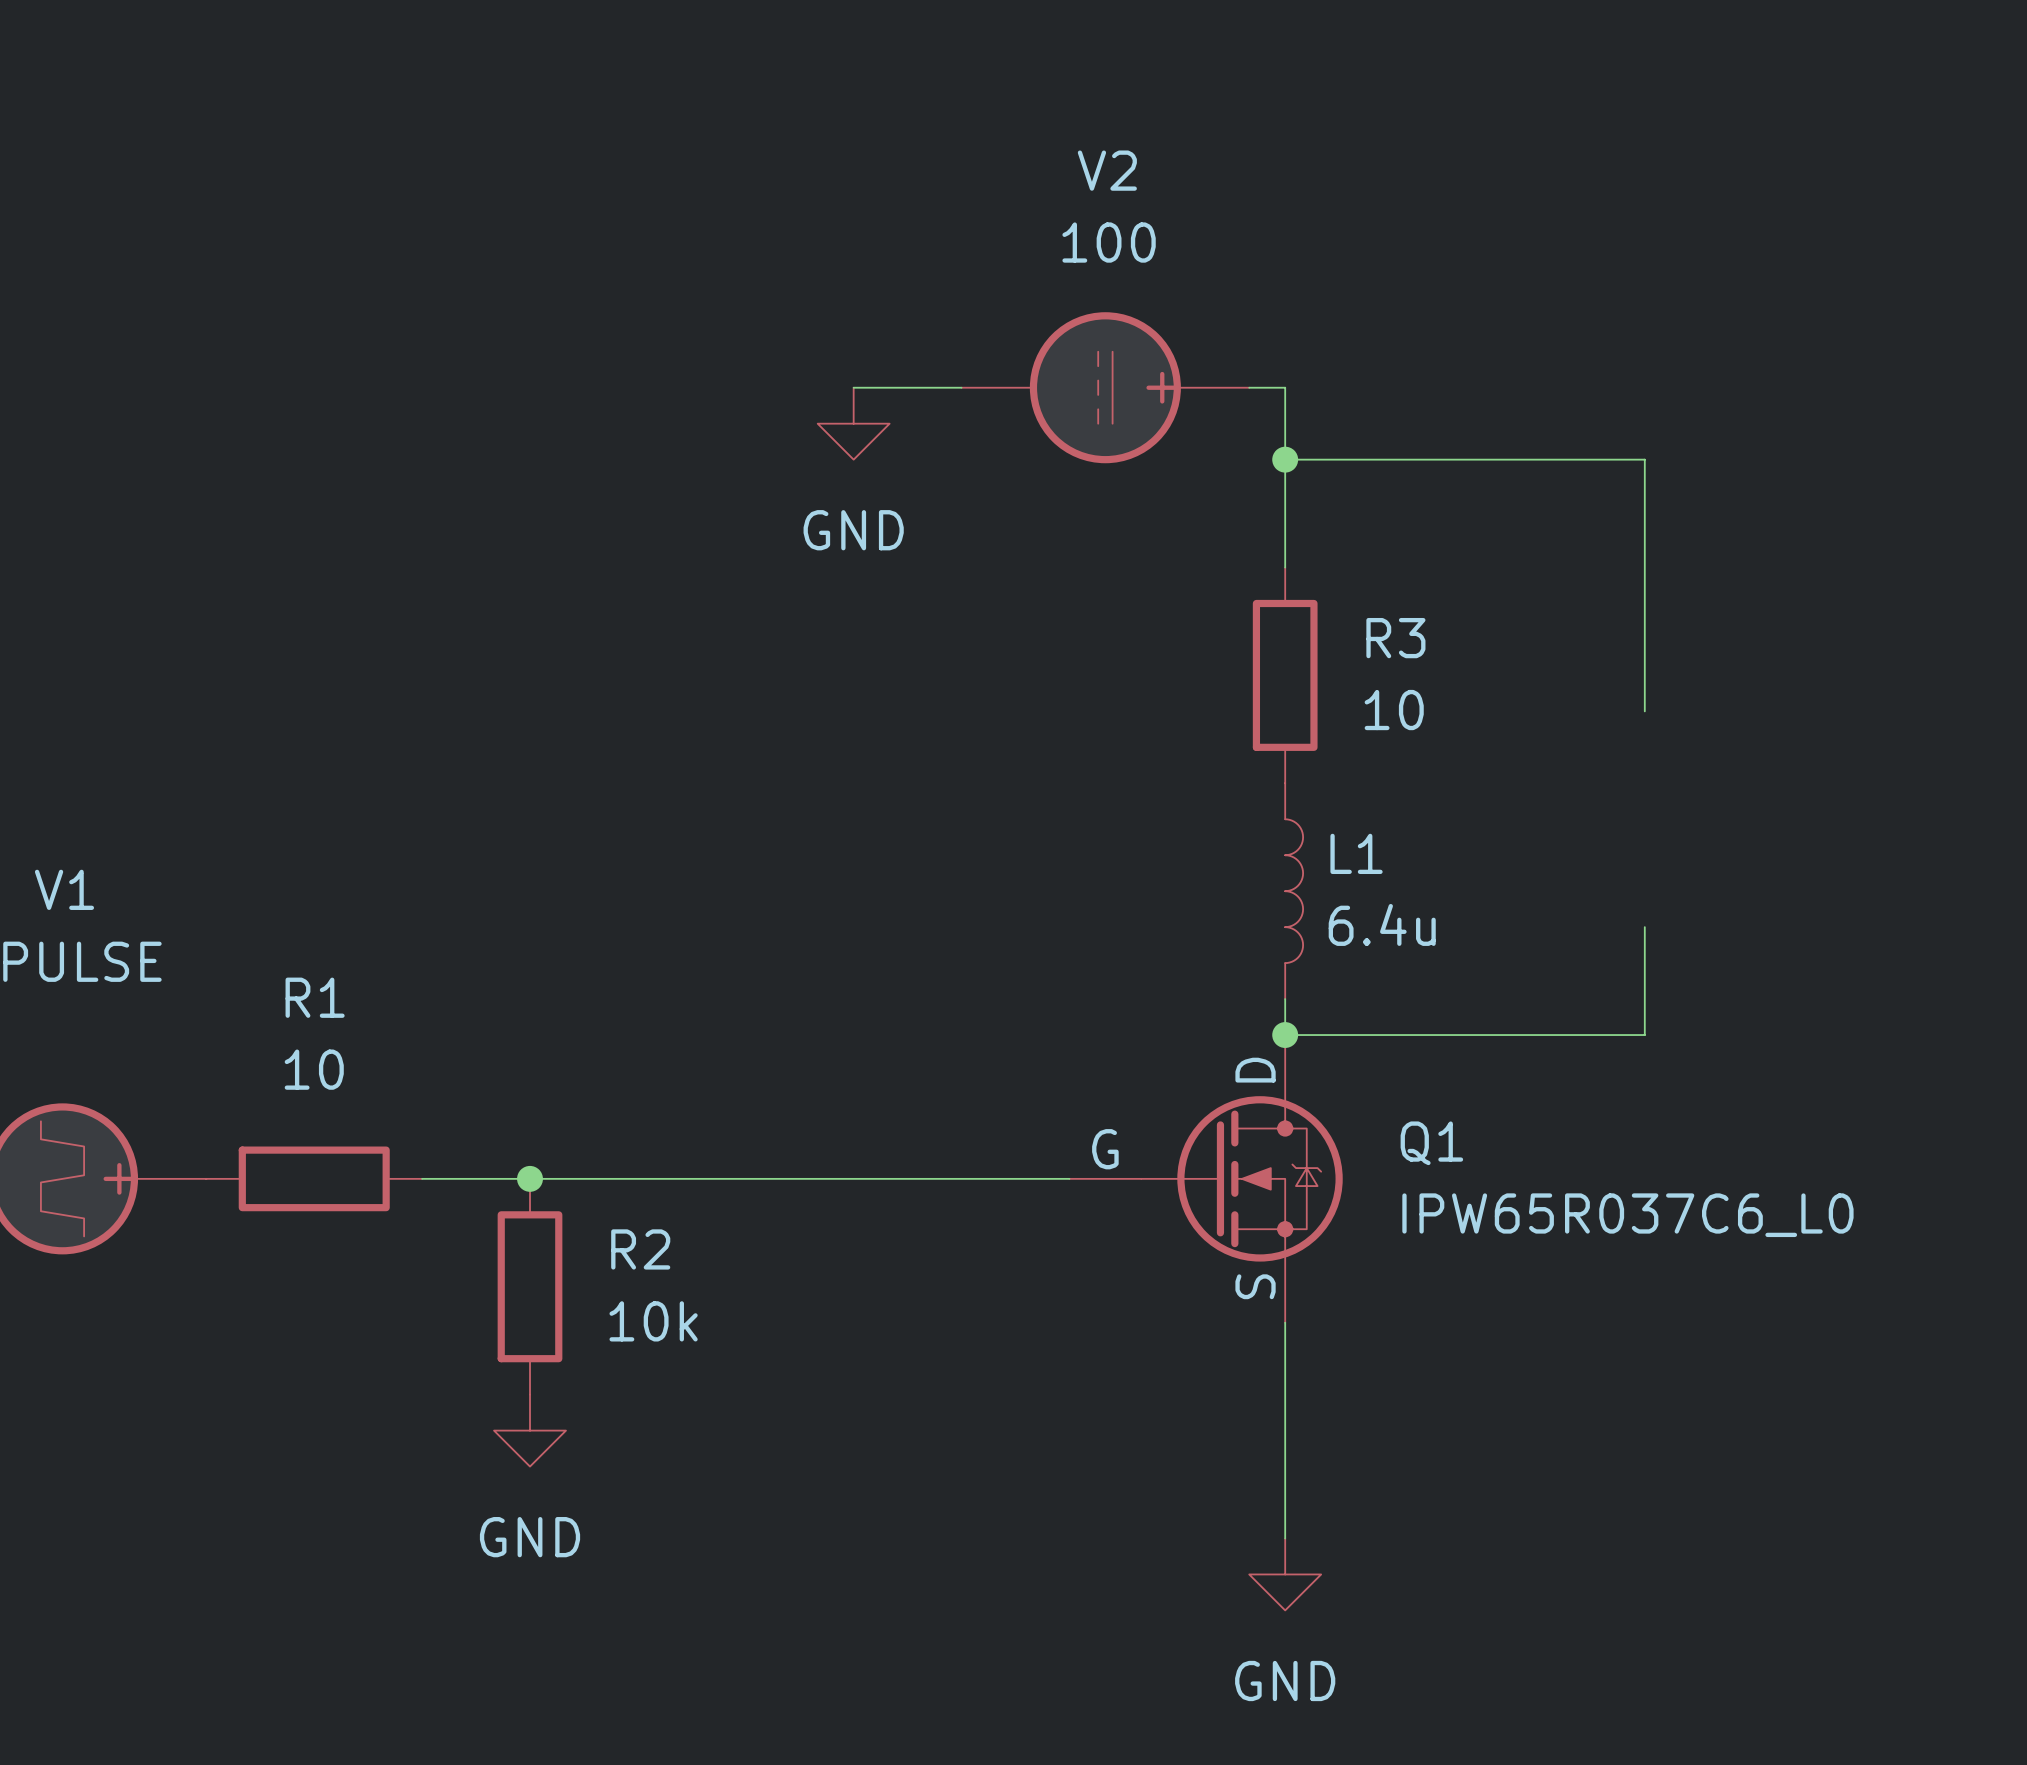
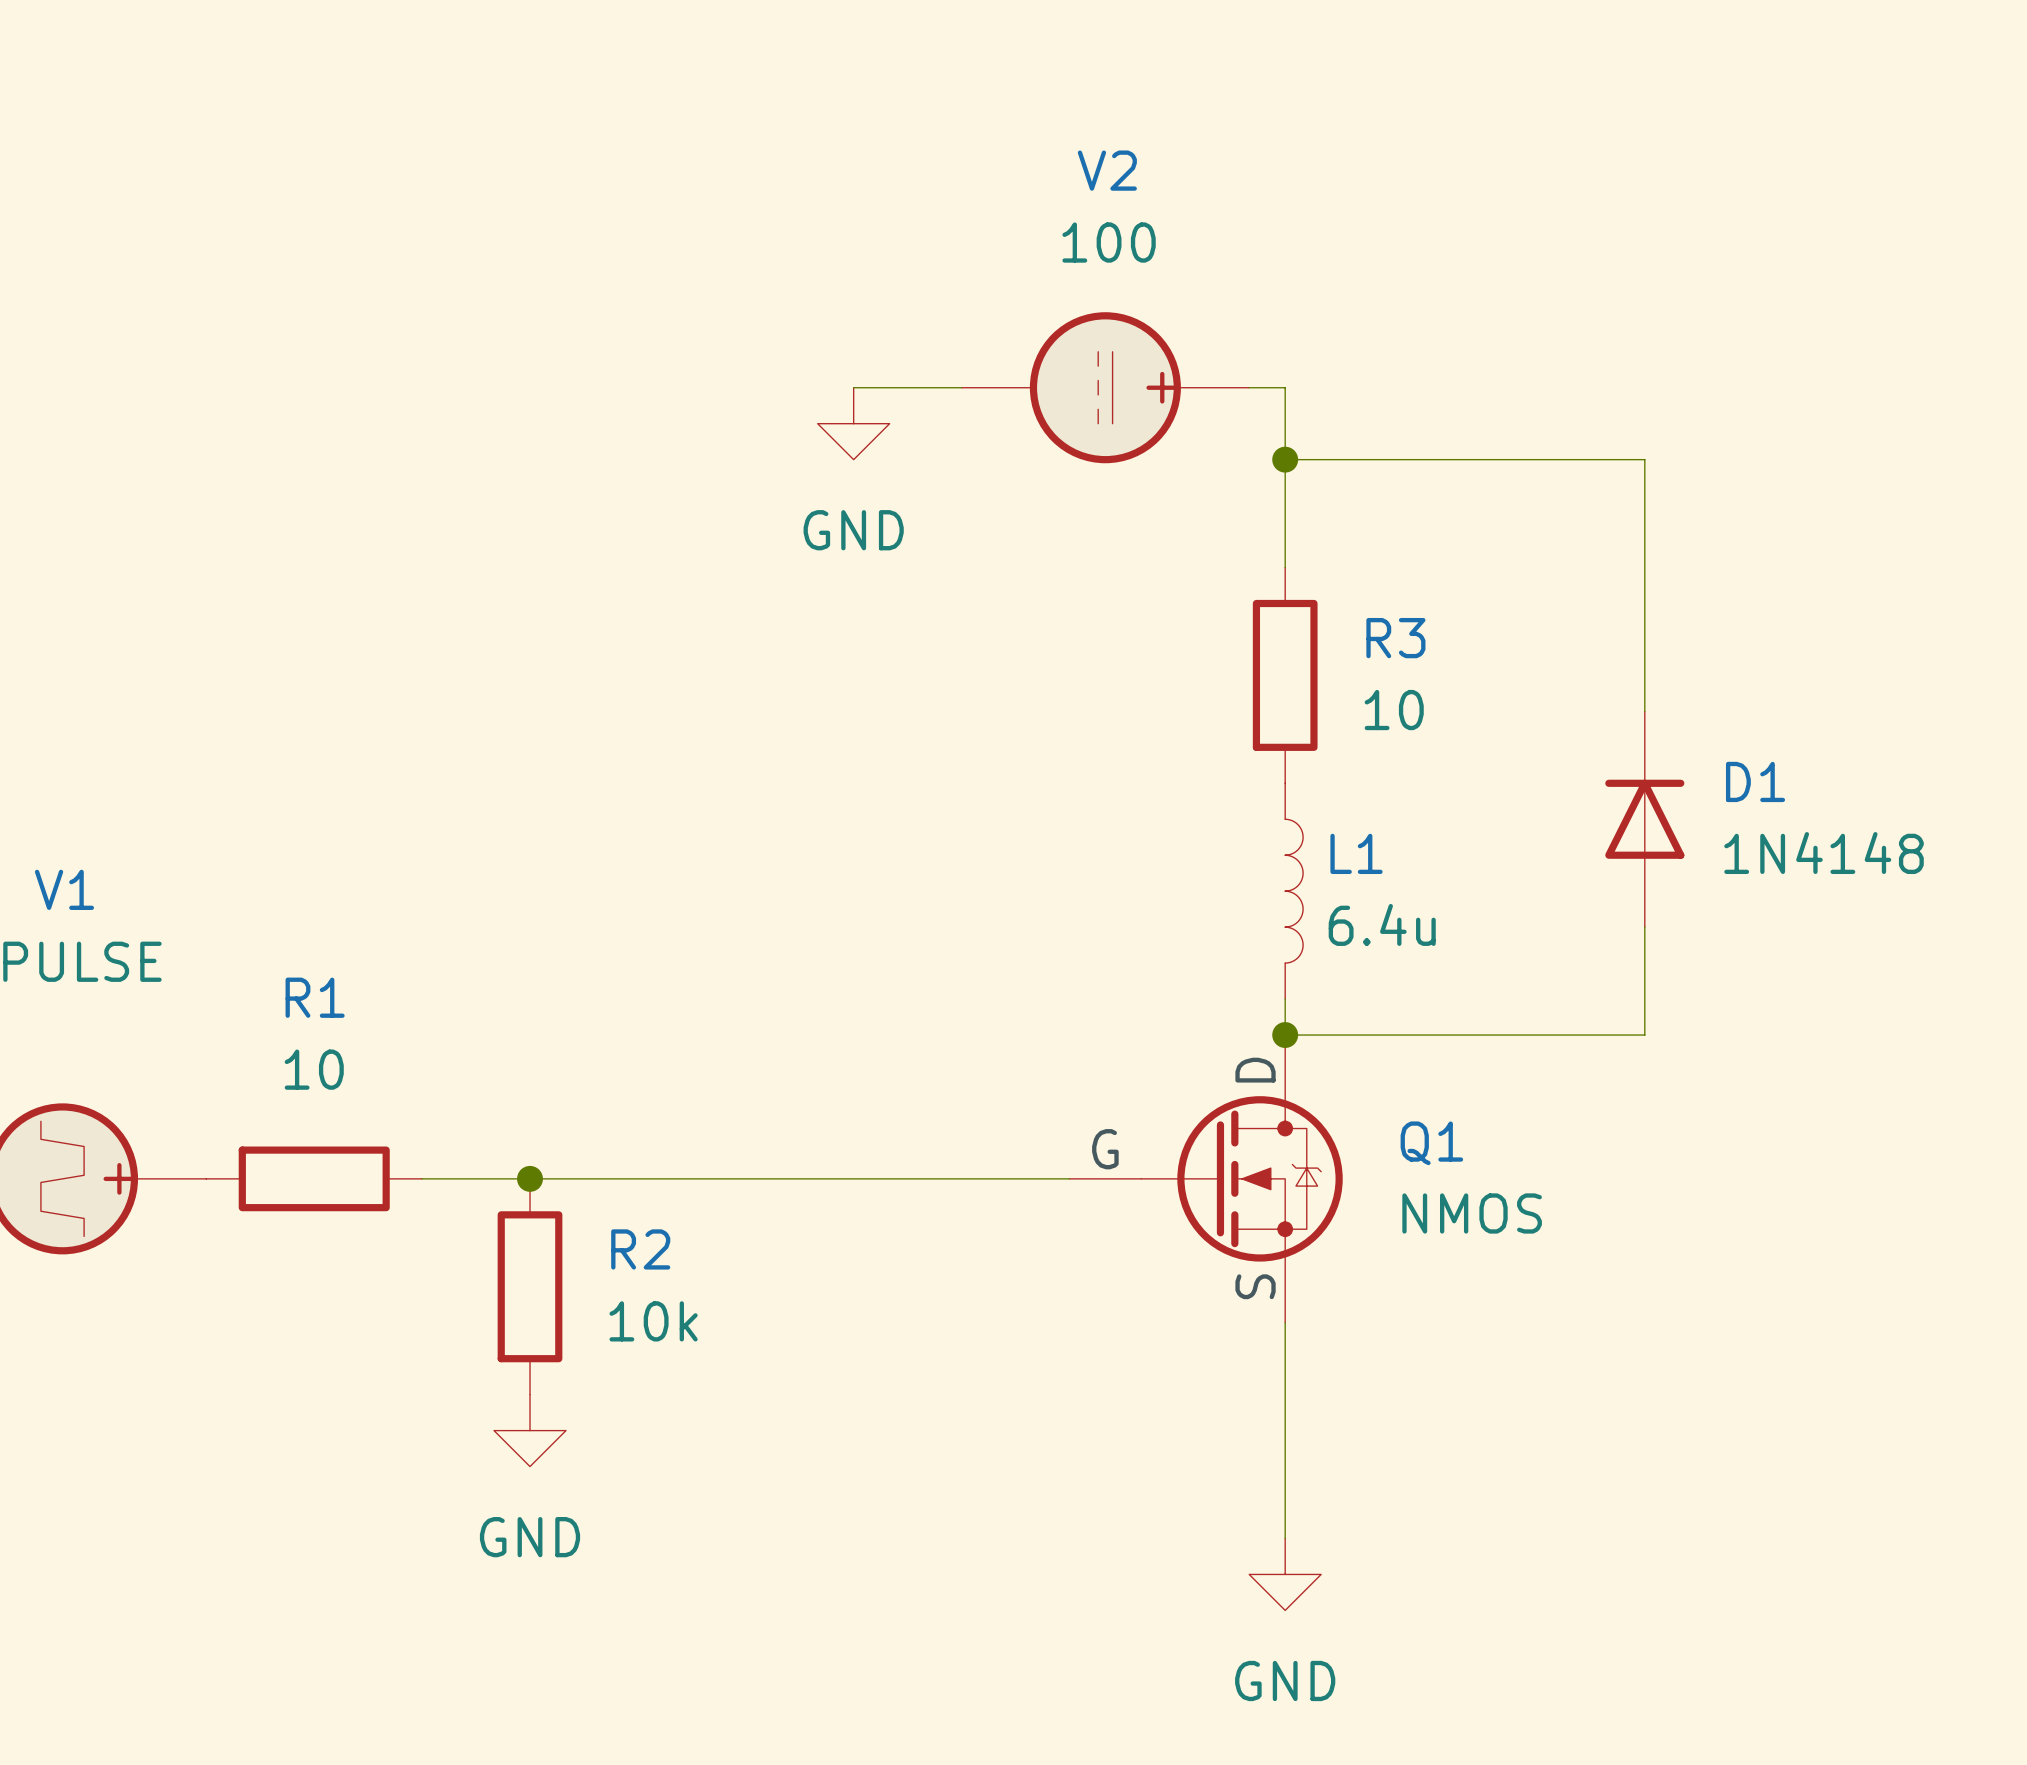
D1: none -> 1N4148 (1644, 819)
Q1 value: IPW65R037C6_L0 (1627, 1215) -> NMOS (1472, 1213)

